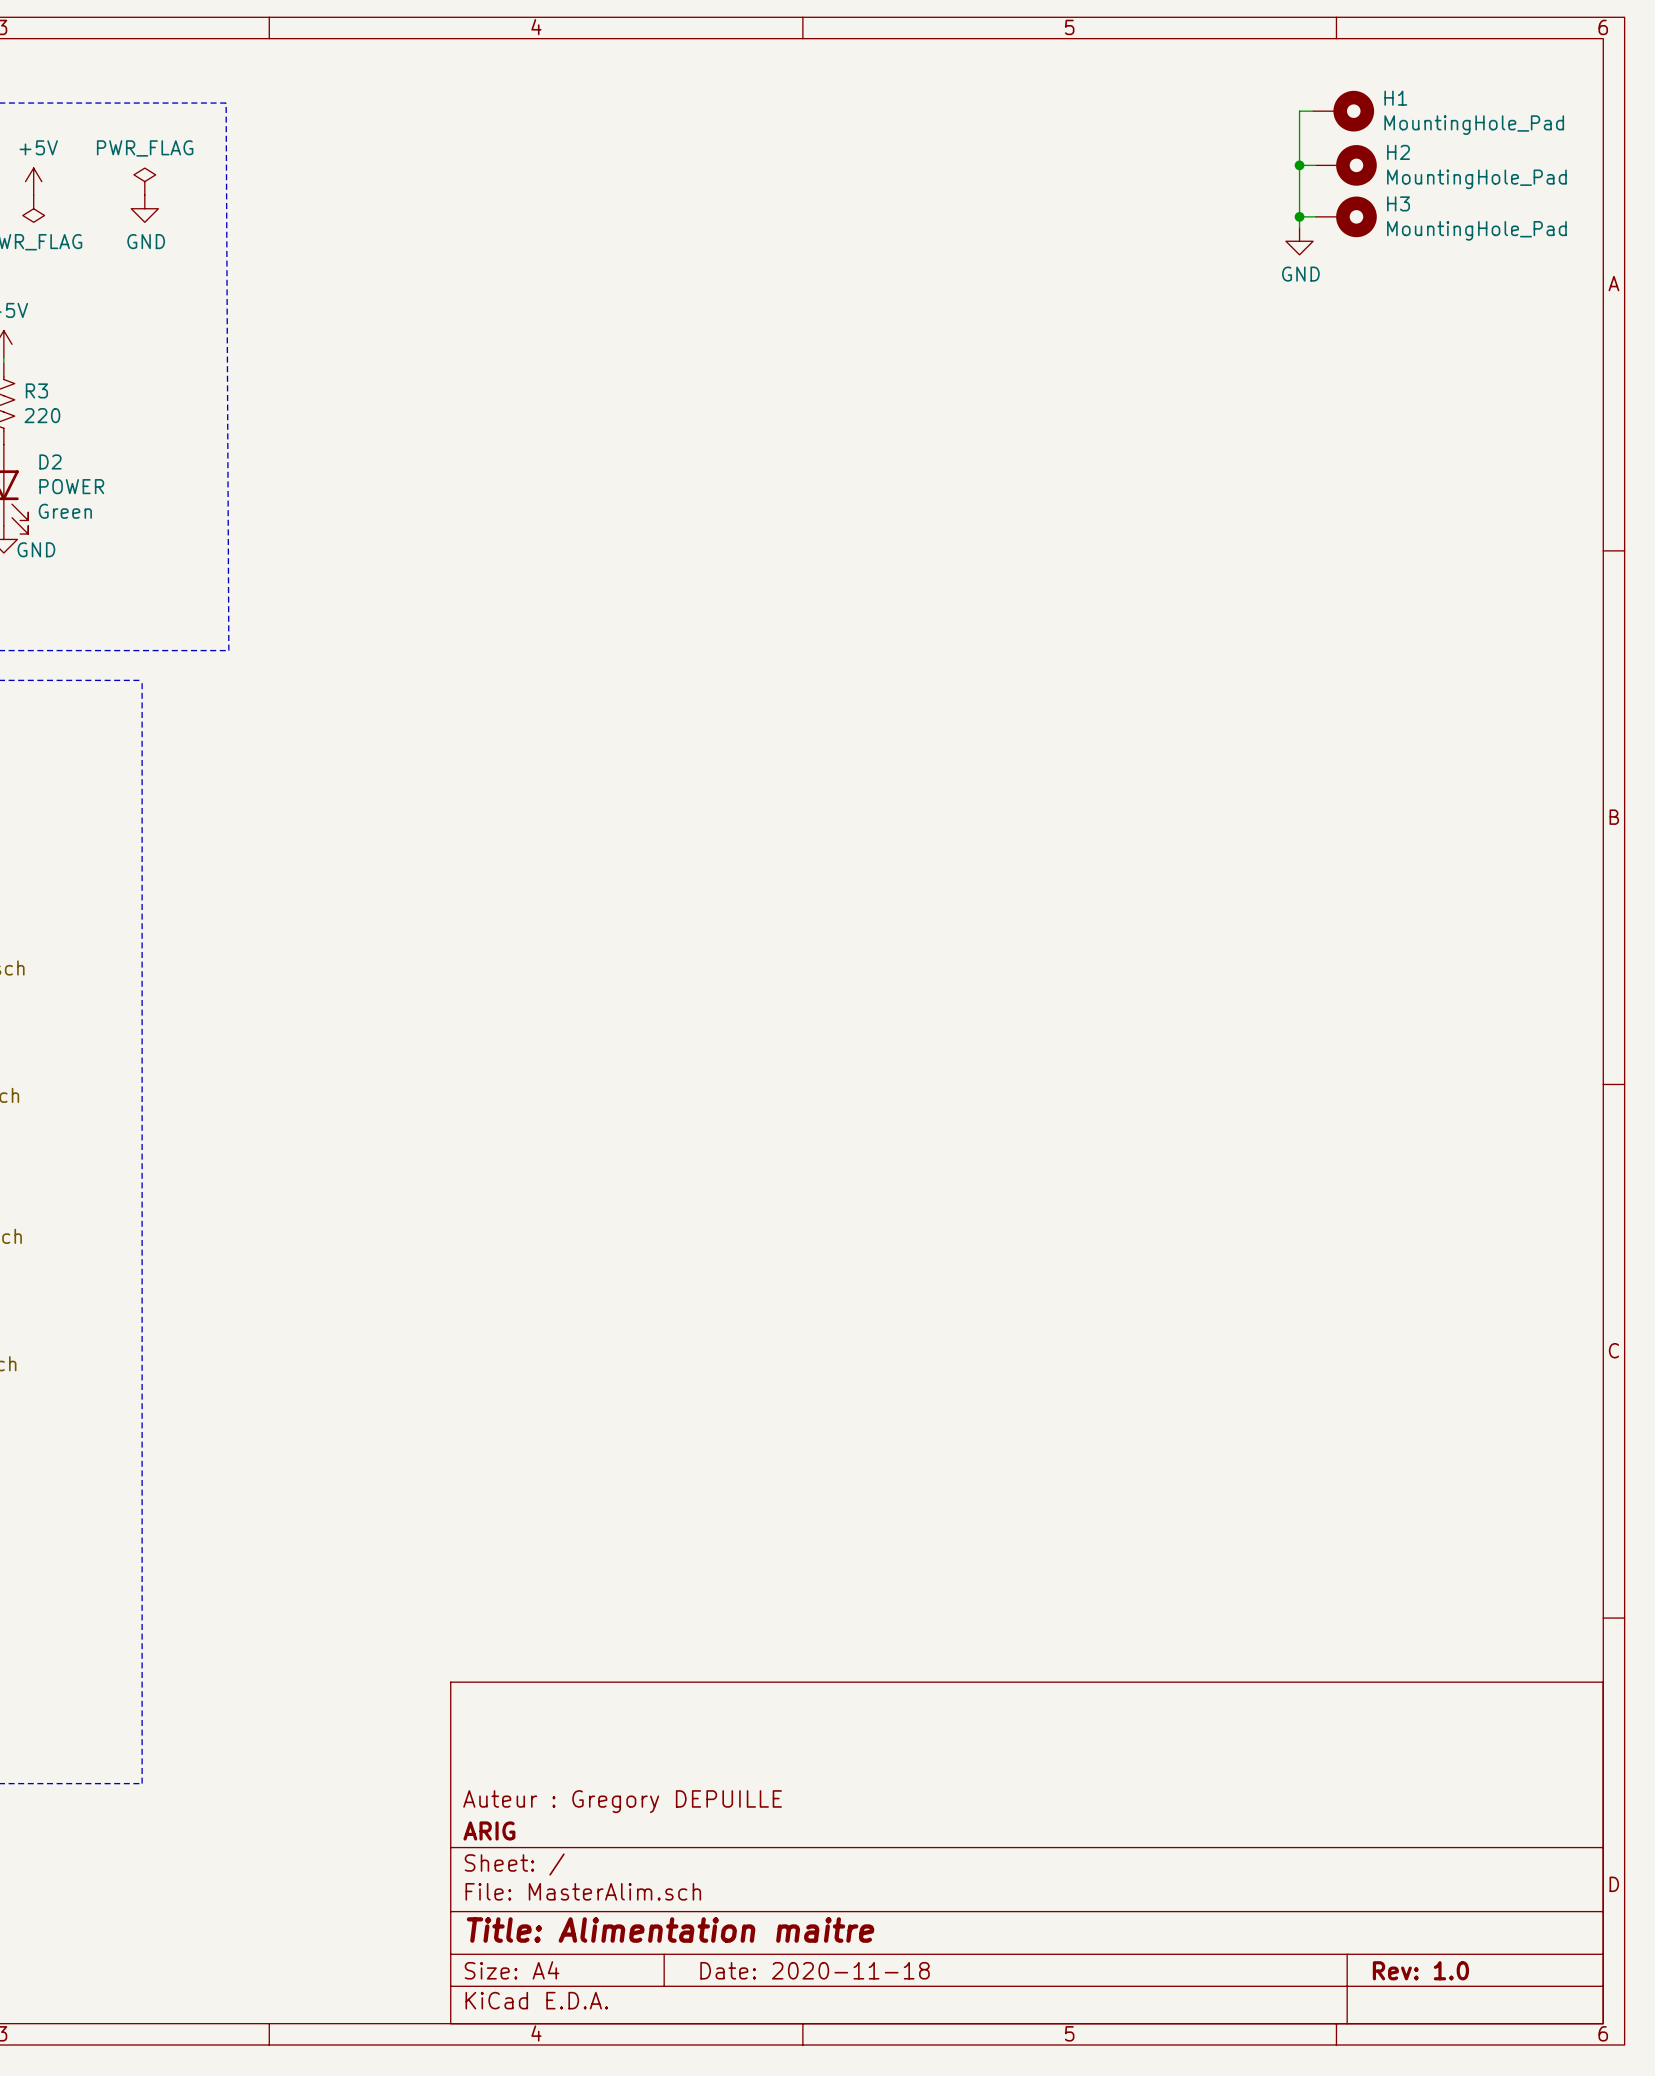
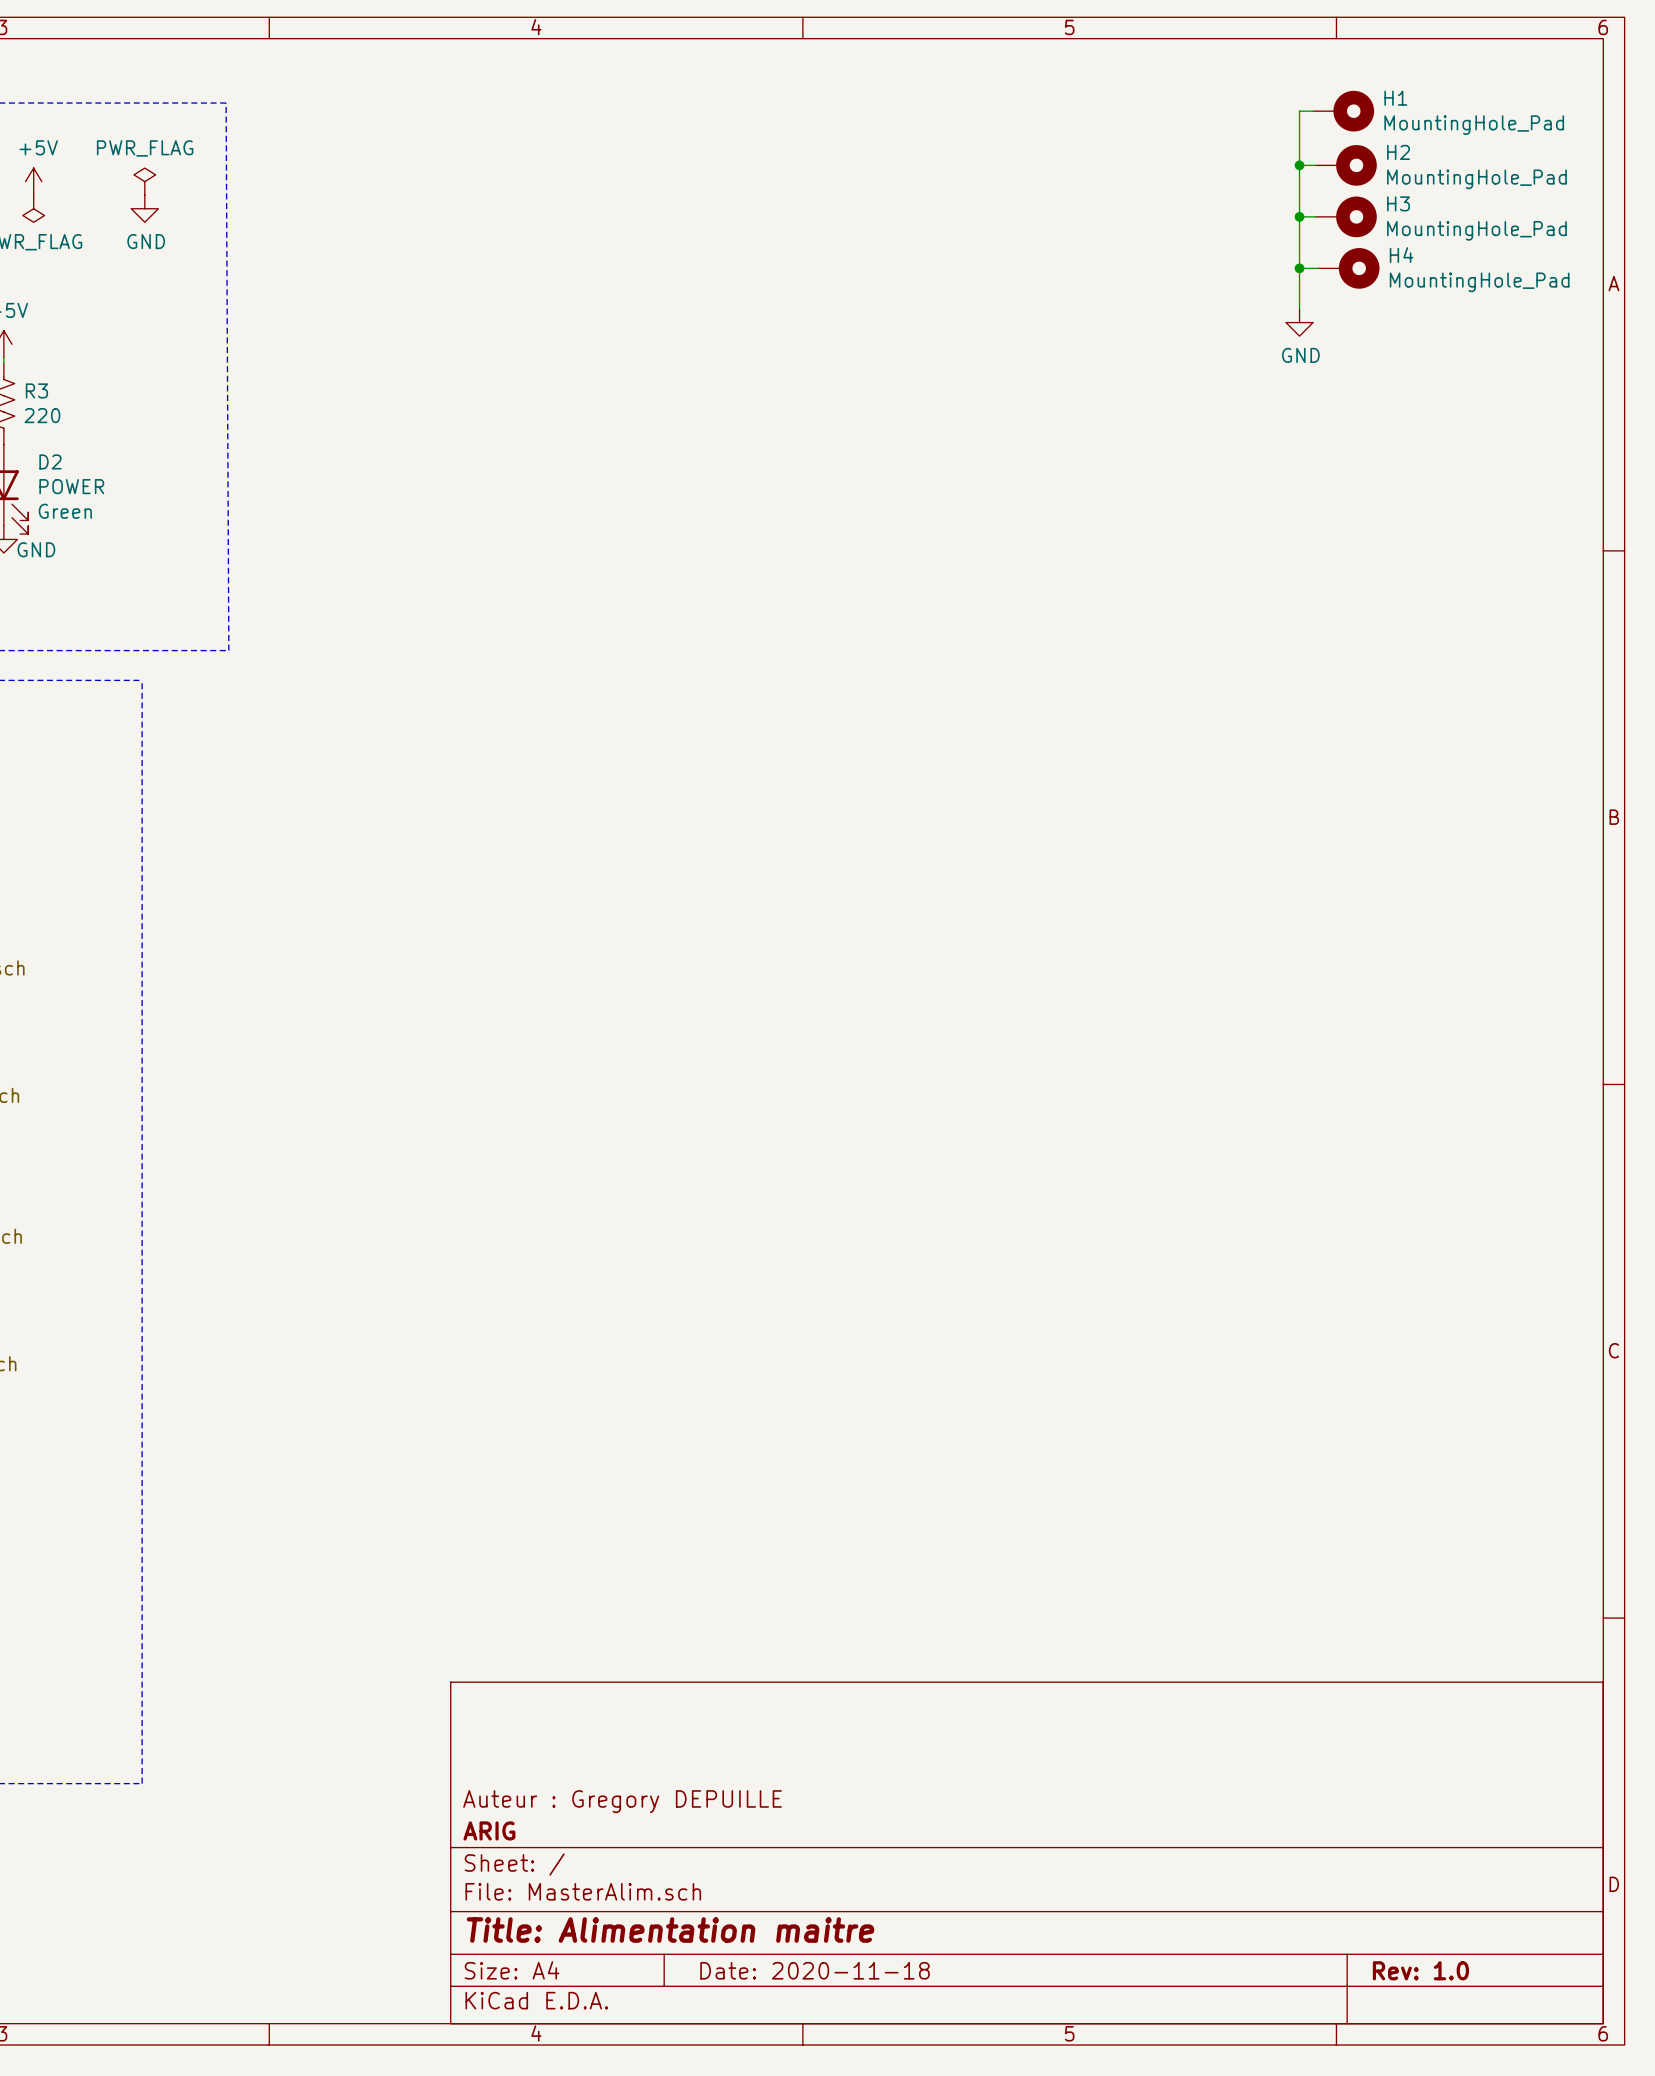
wire: none -> (1299, 227) (1299, 309)
power symbol position: GND (1299, 241) -> GND (1299, 322)
wire: none -> (1299, 268) (1318, 268)
junction: none -> (1299, 268)
H4: none -> MountingHole_Pad (1349, 268)

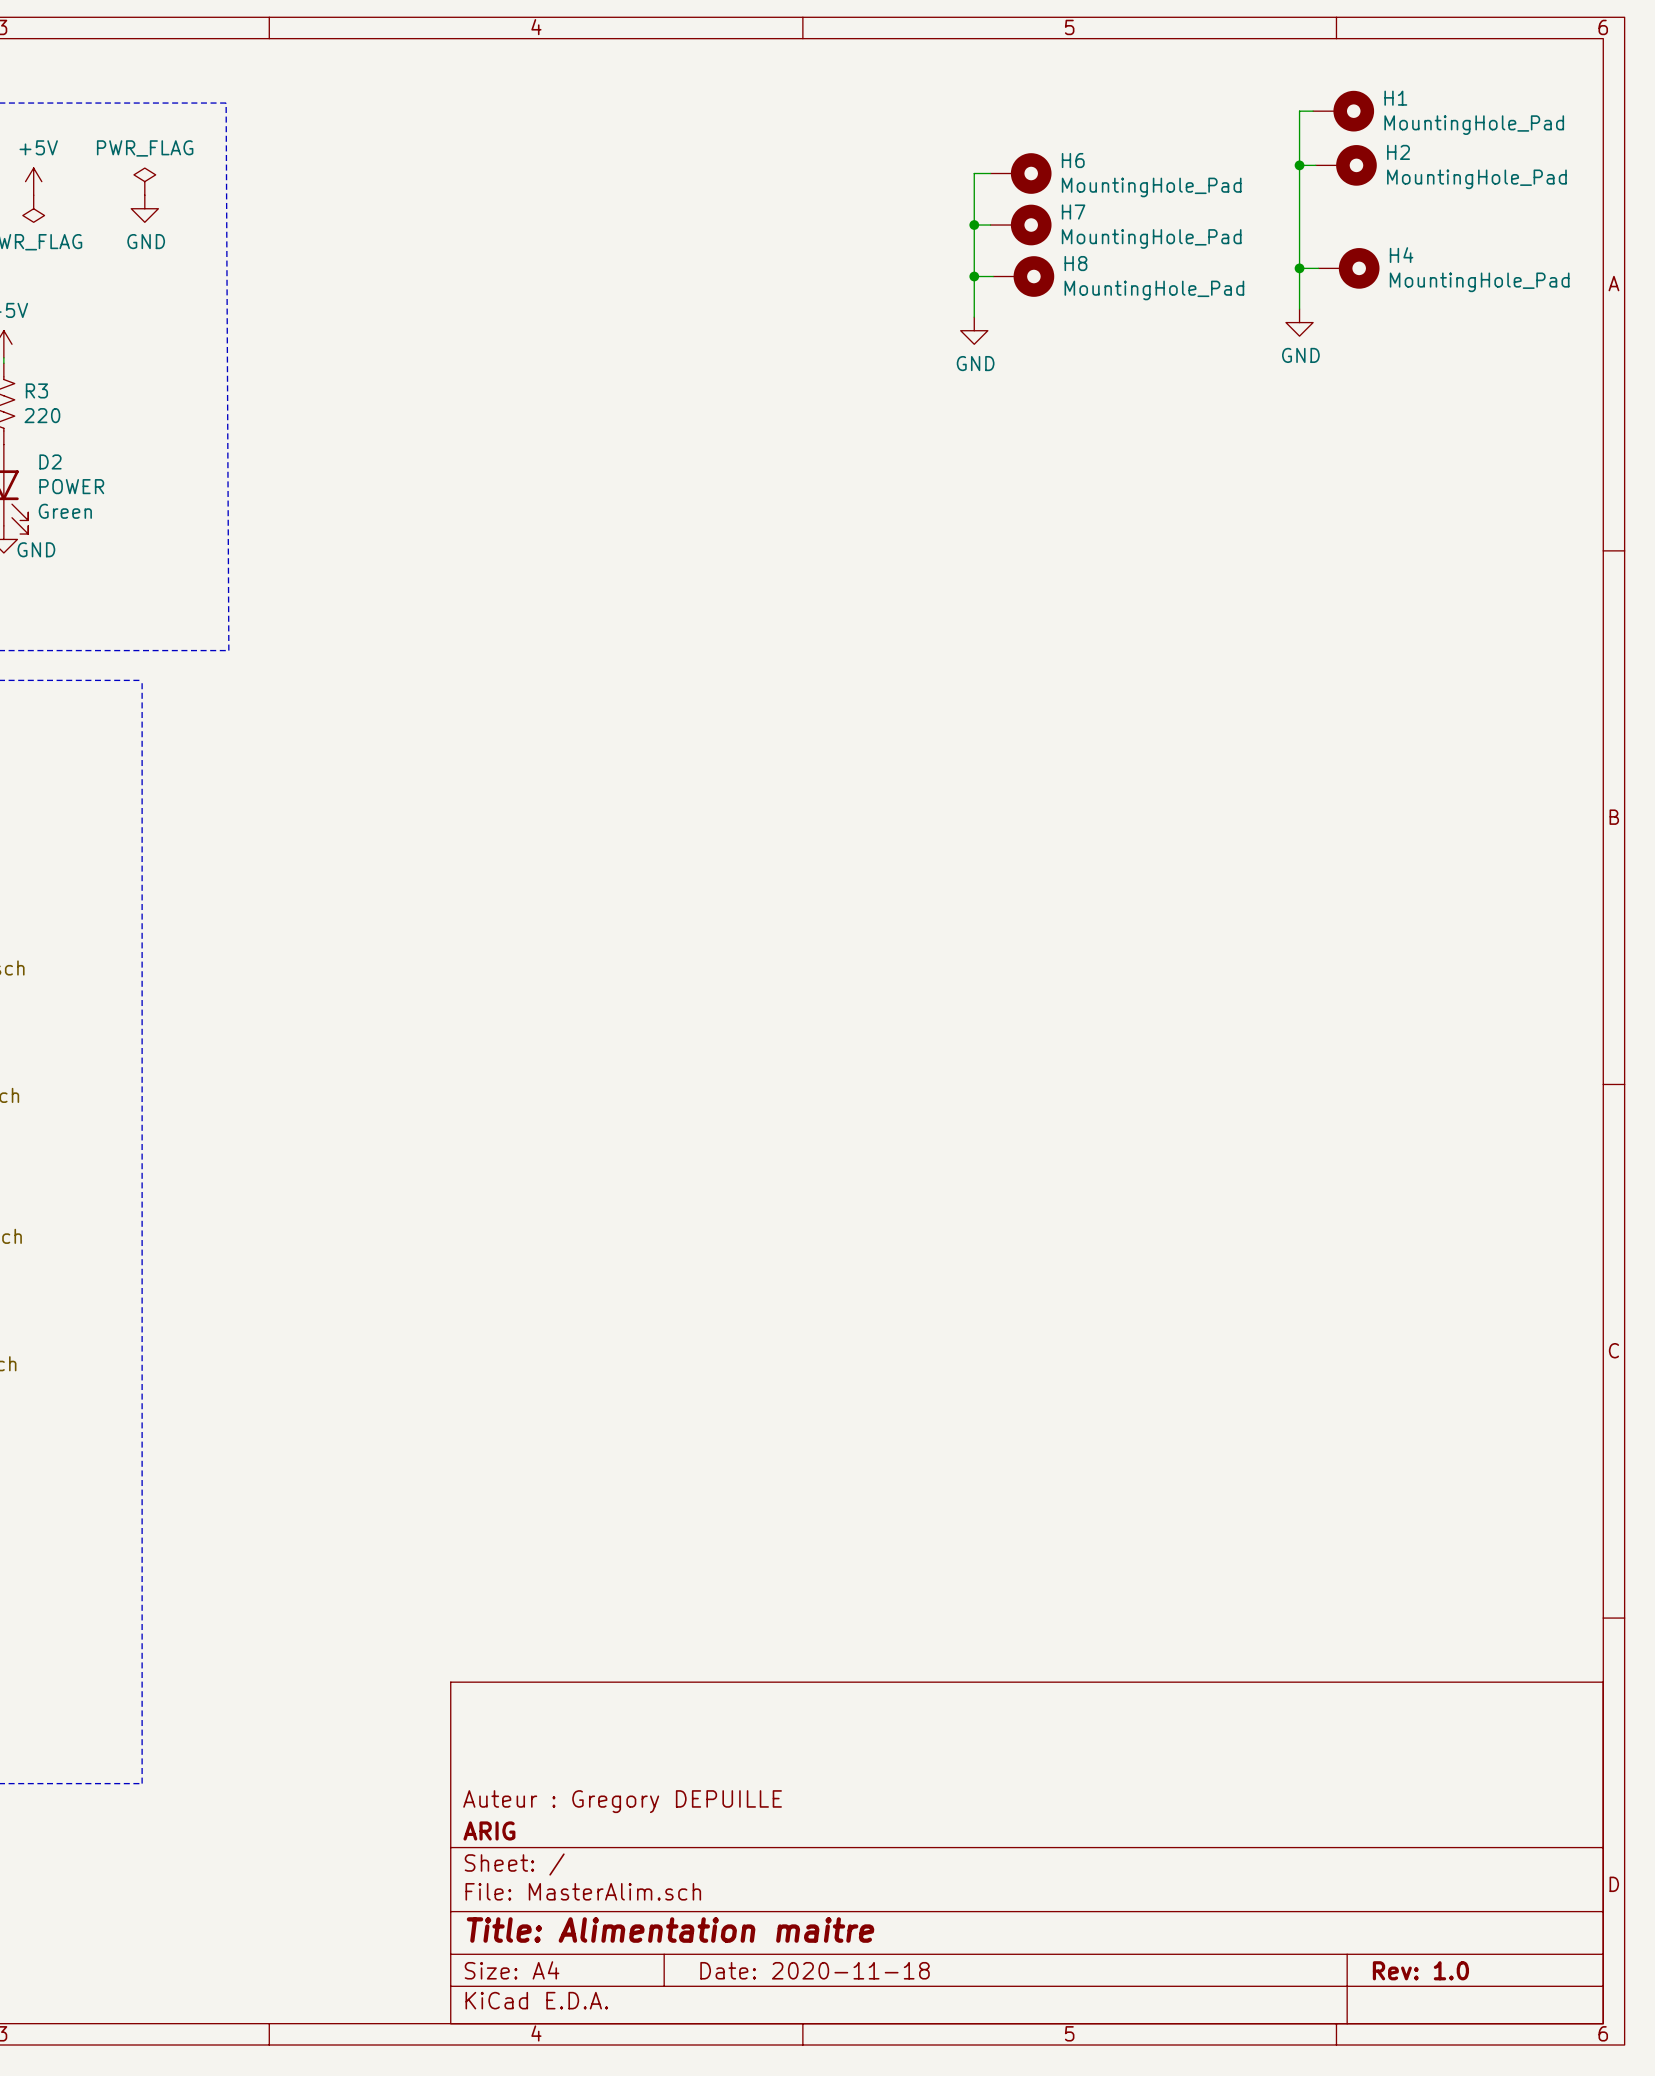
wire: none -> (990, 173) (974, 173) (974, 317)
H6: none -> MountingHole_Pad (1021, 173)
wire: (1299, 216) (1315, 216) -> none
junction: (1299, 216) -> none
H3: MountingHole_Pad (1346, 216) -> none
wire: none -> (974, 225) (990, 225)
junction: none -> (974, 225)
H7: none -> MountingHole_Pad (1021, 225)
wire: none -> (974, 276) (993, 276)
junction: none -> (974, 276)
H8: none -> MountingHole_Pad (1023, 276)
power symbol: none -> GND (974, 330)

